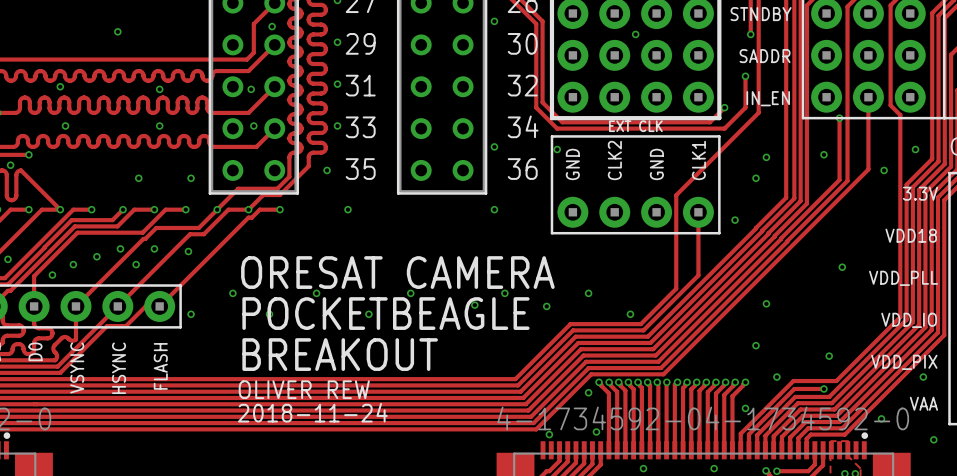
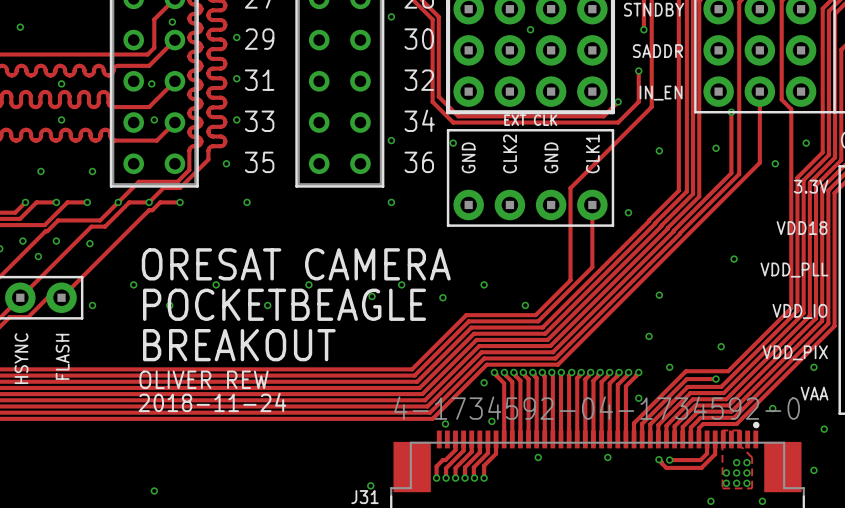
via: (755, 178) -> none

